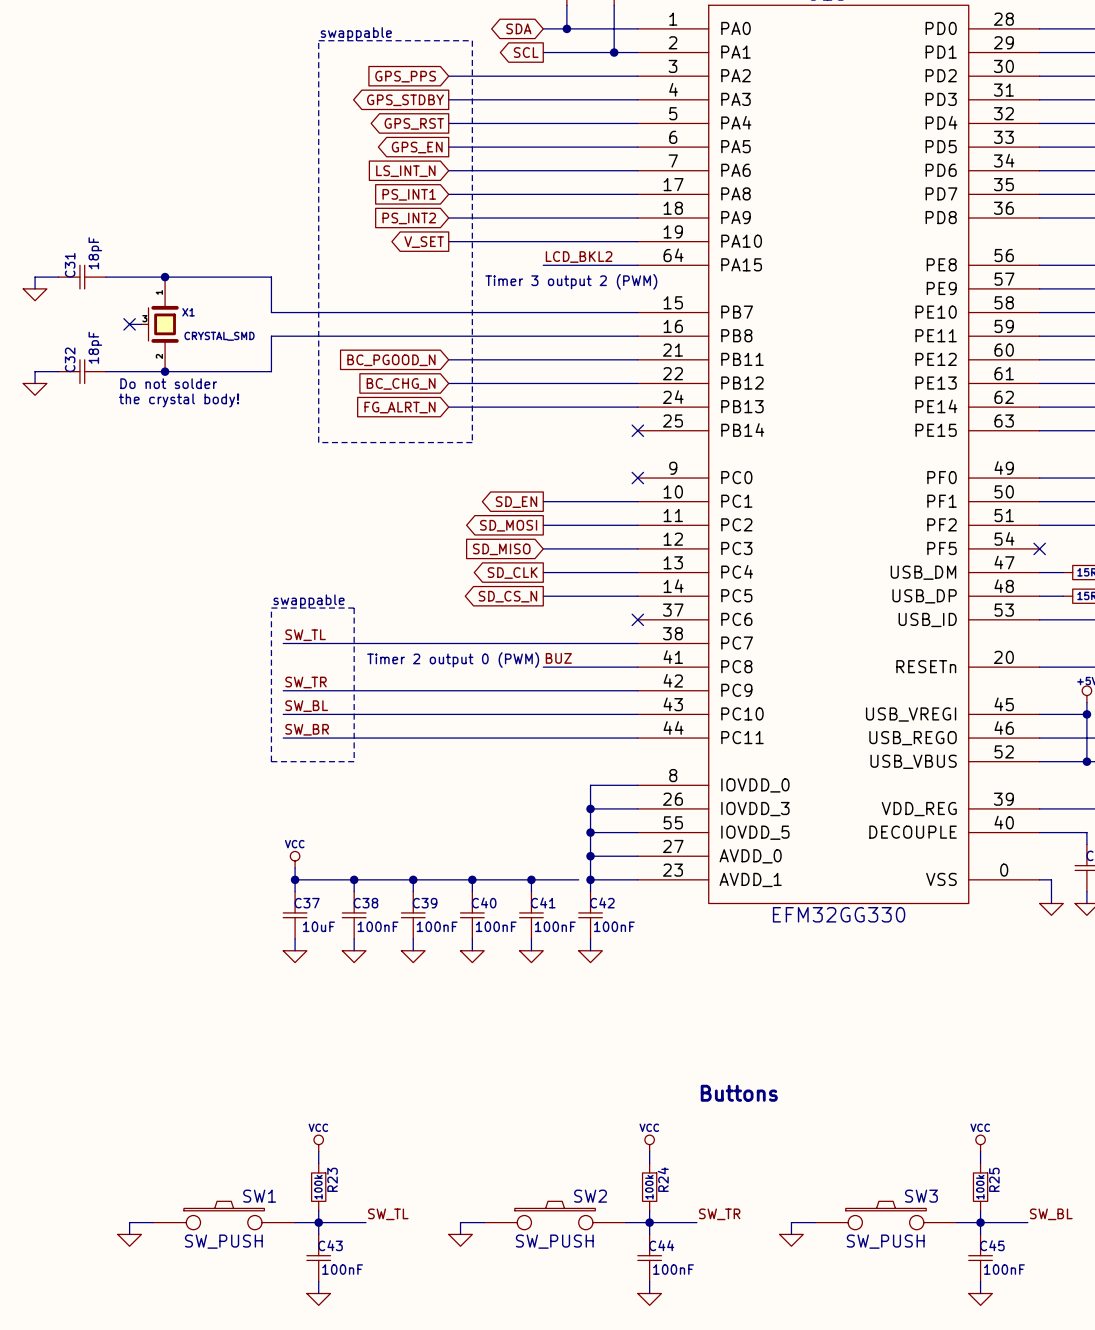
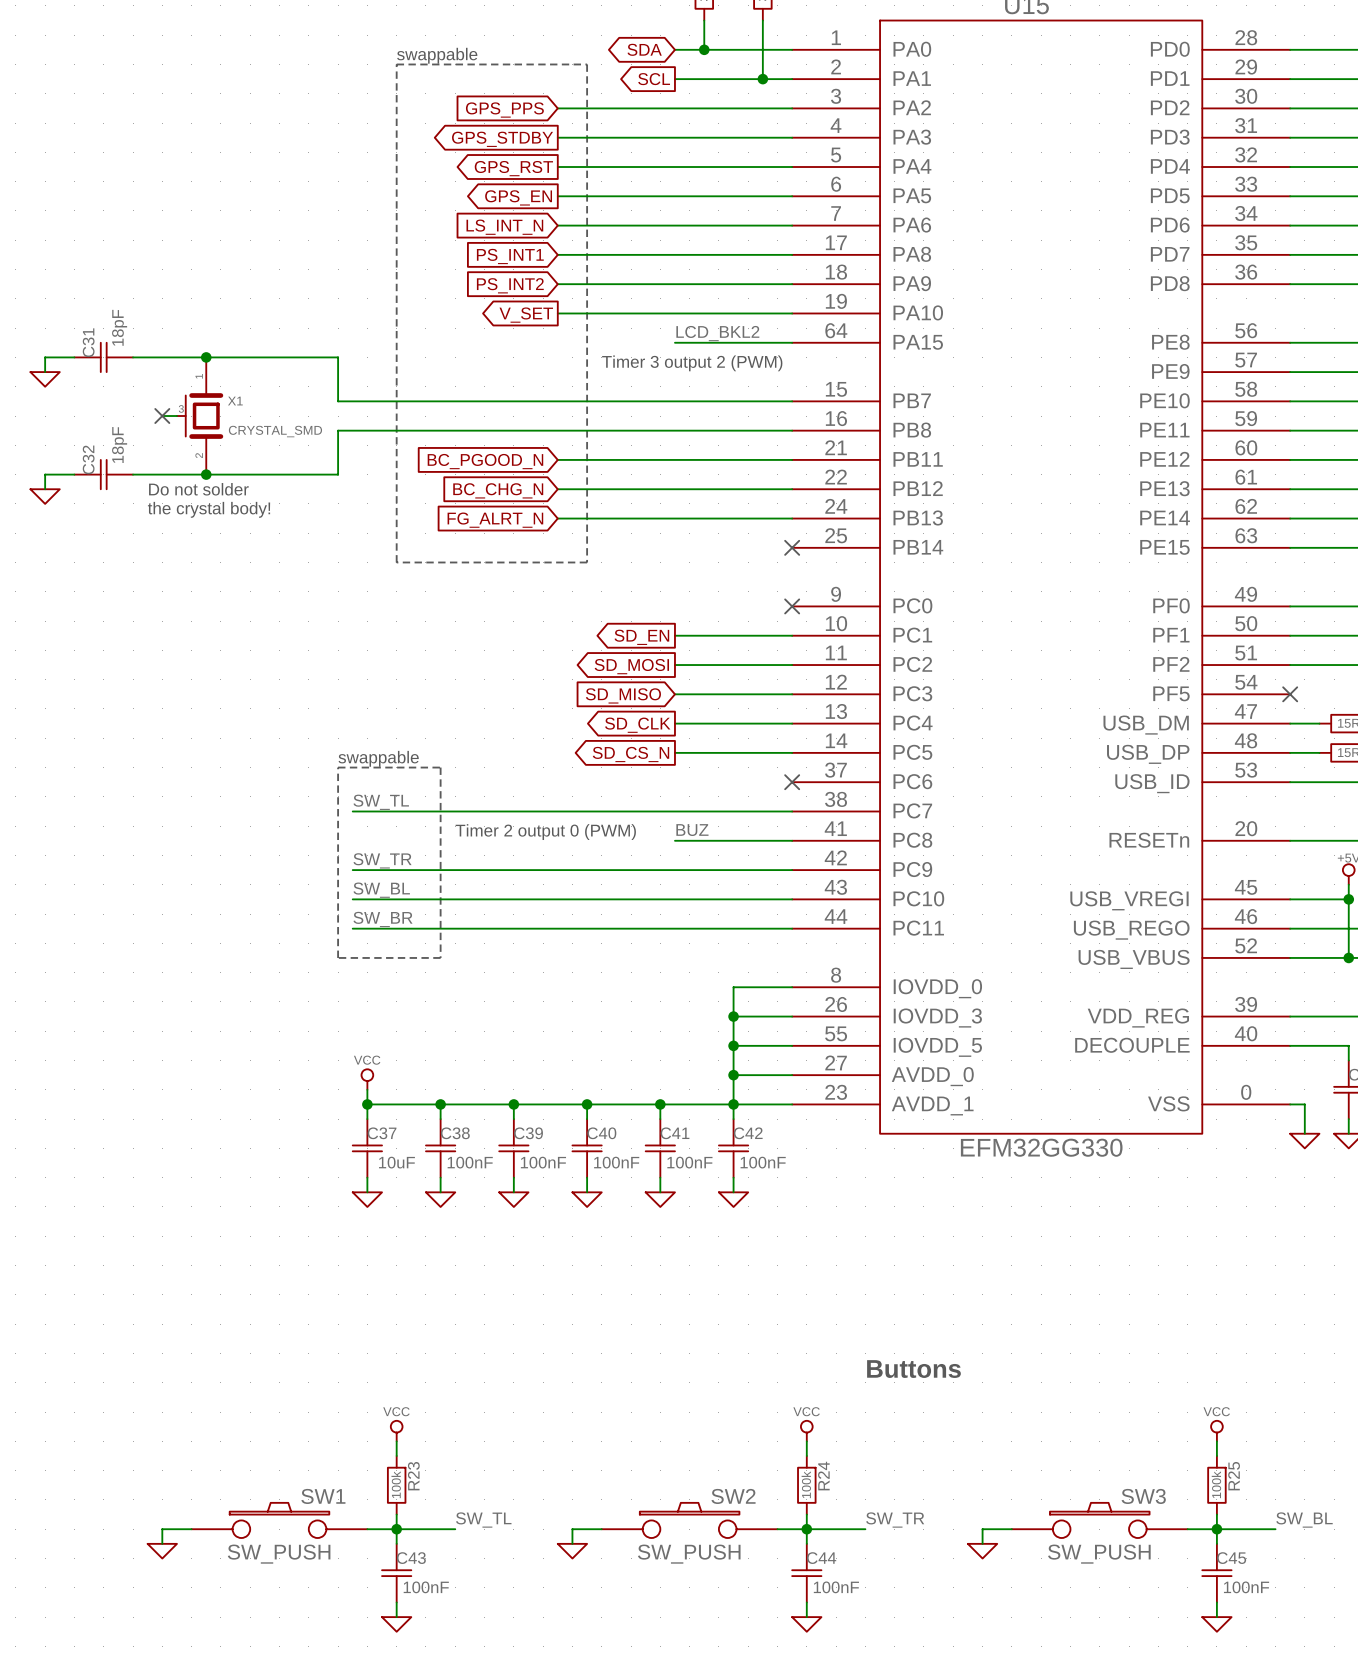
wire: none -> (718, 1104) (733, 1104)

